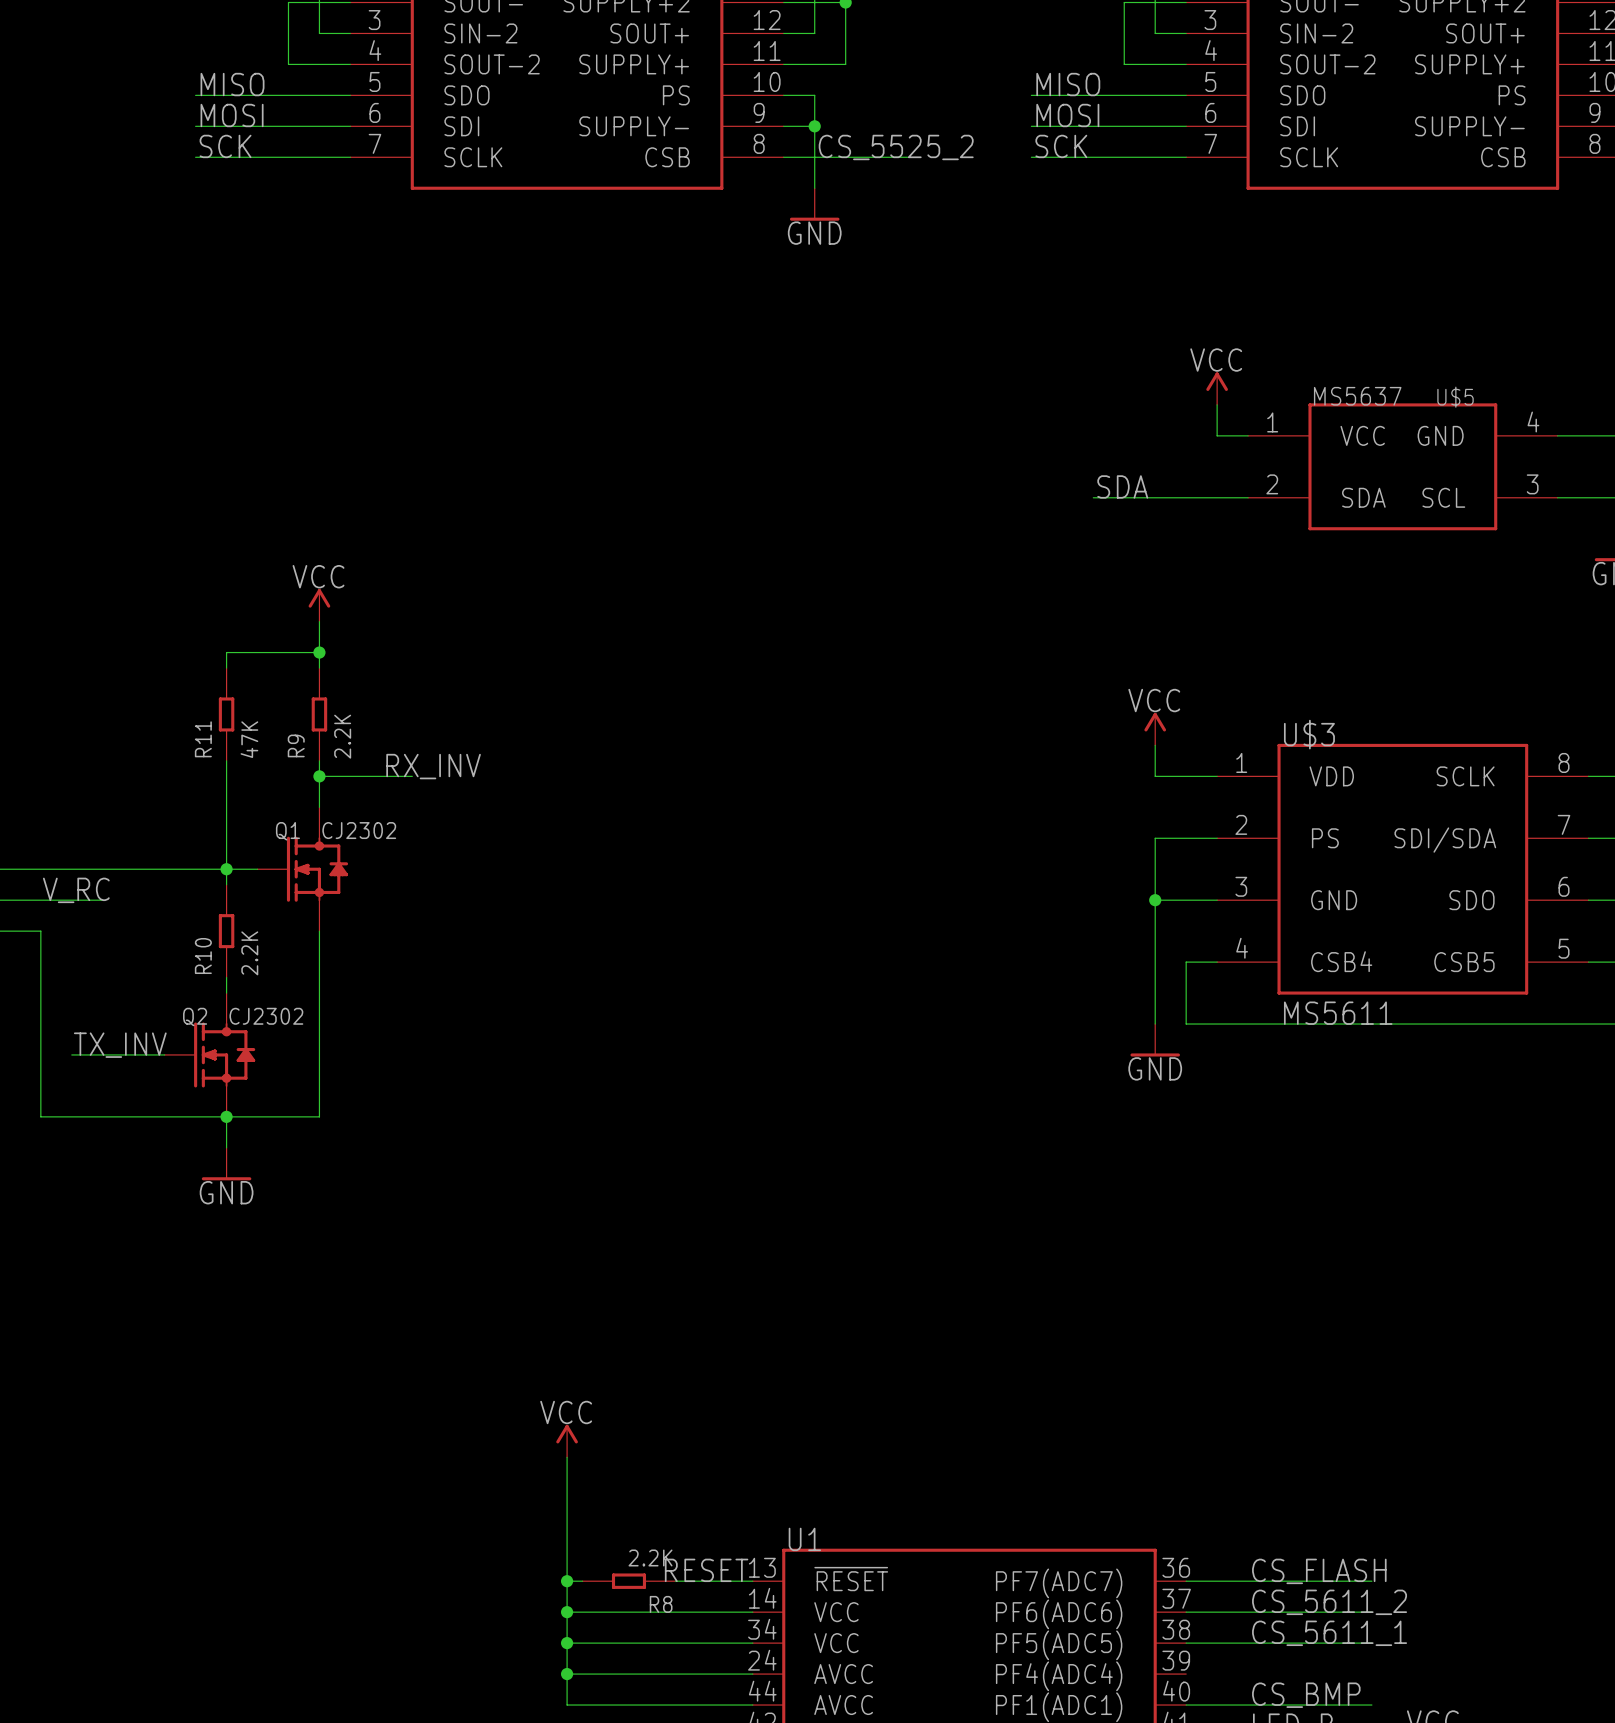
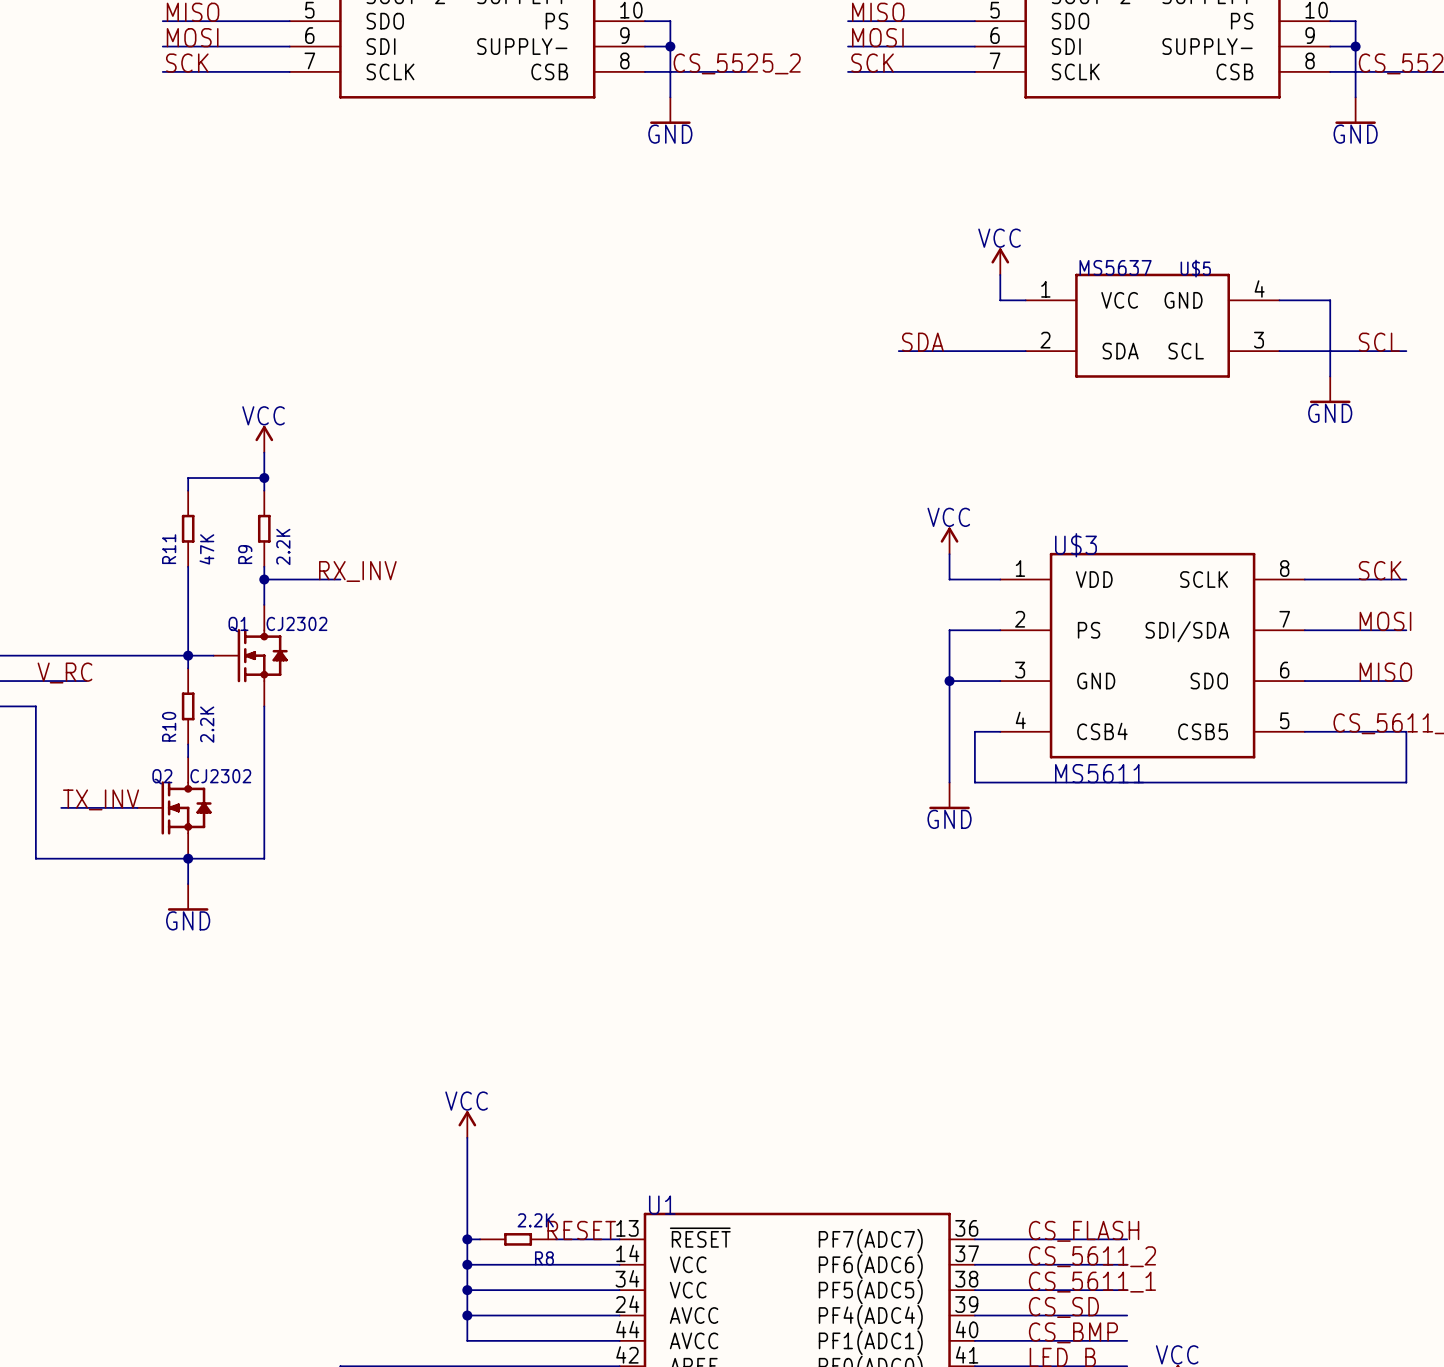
label: none -> CS_SD (1063, 1307)
wire: none -> (974, 1315) (1127, 1315)

